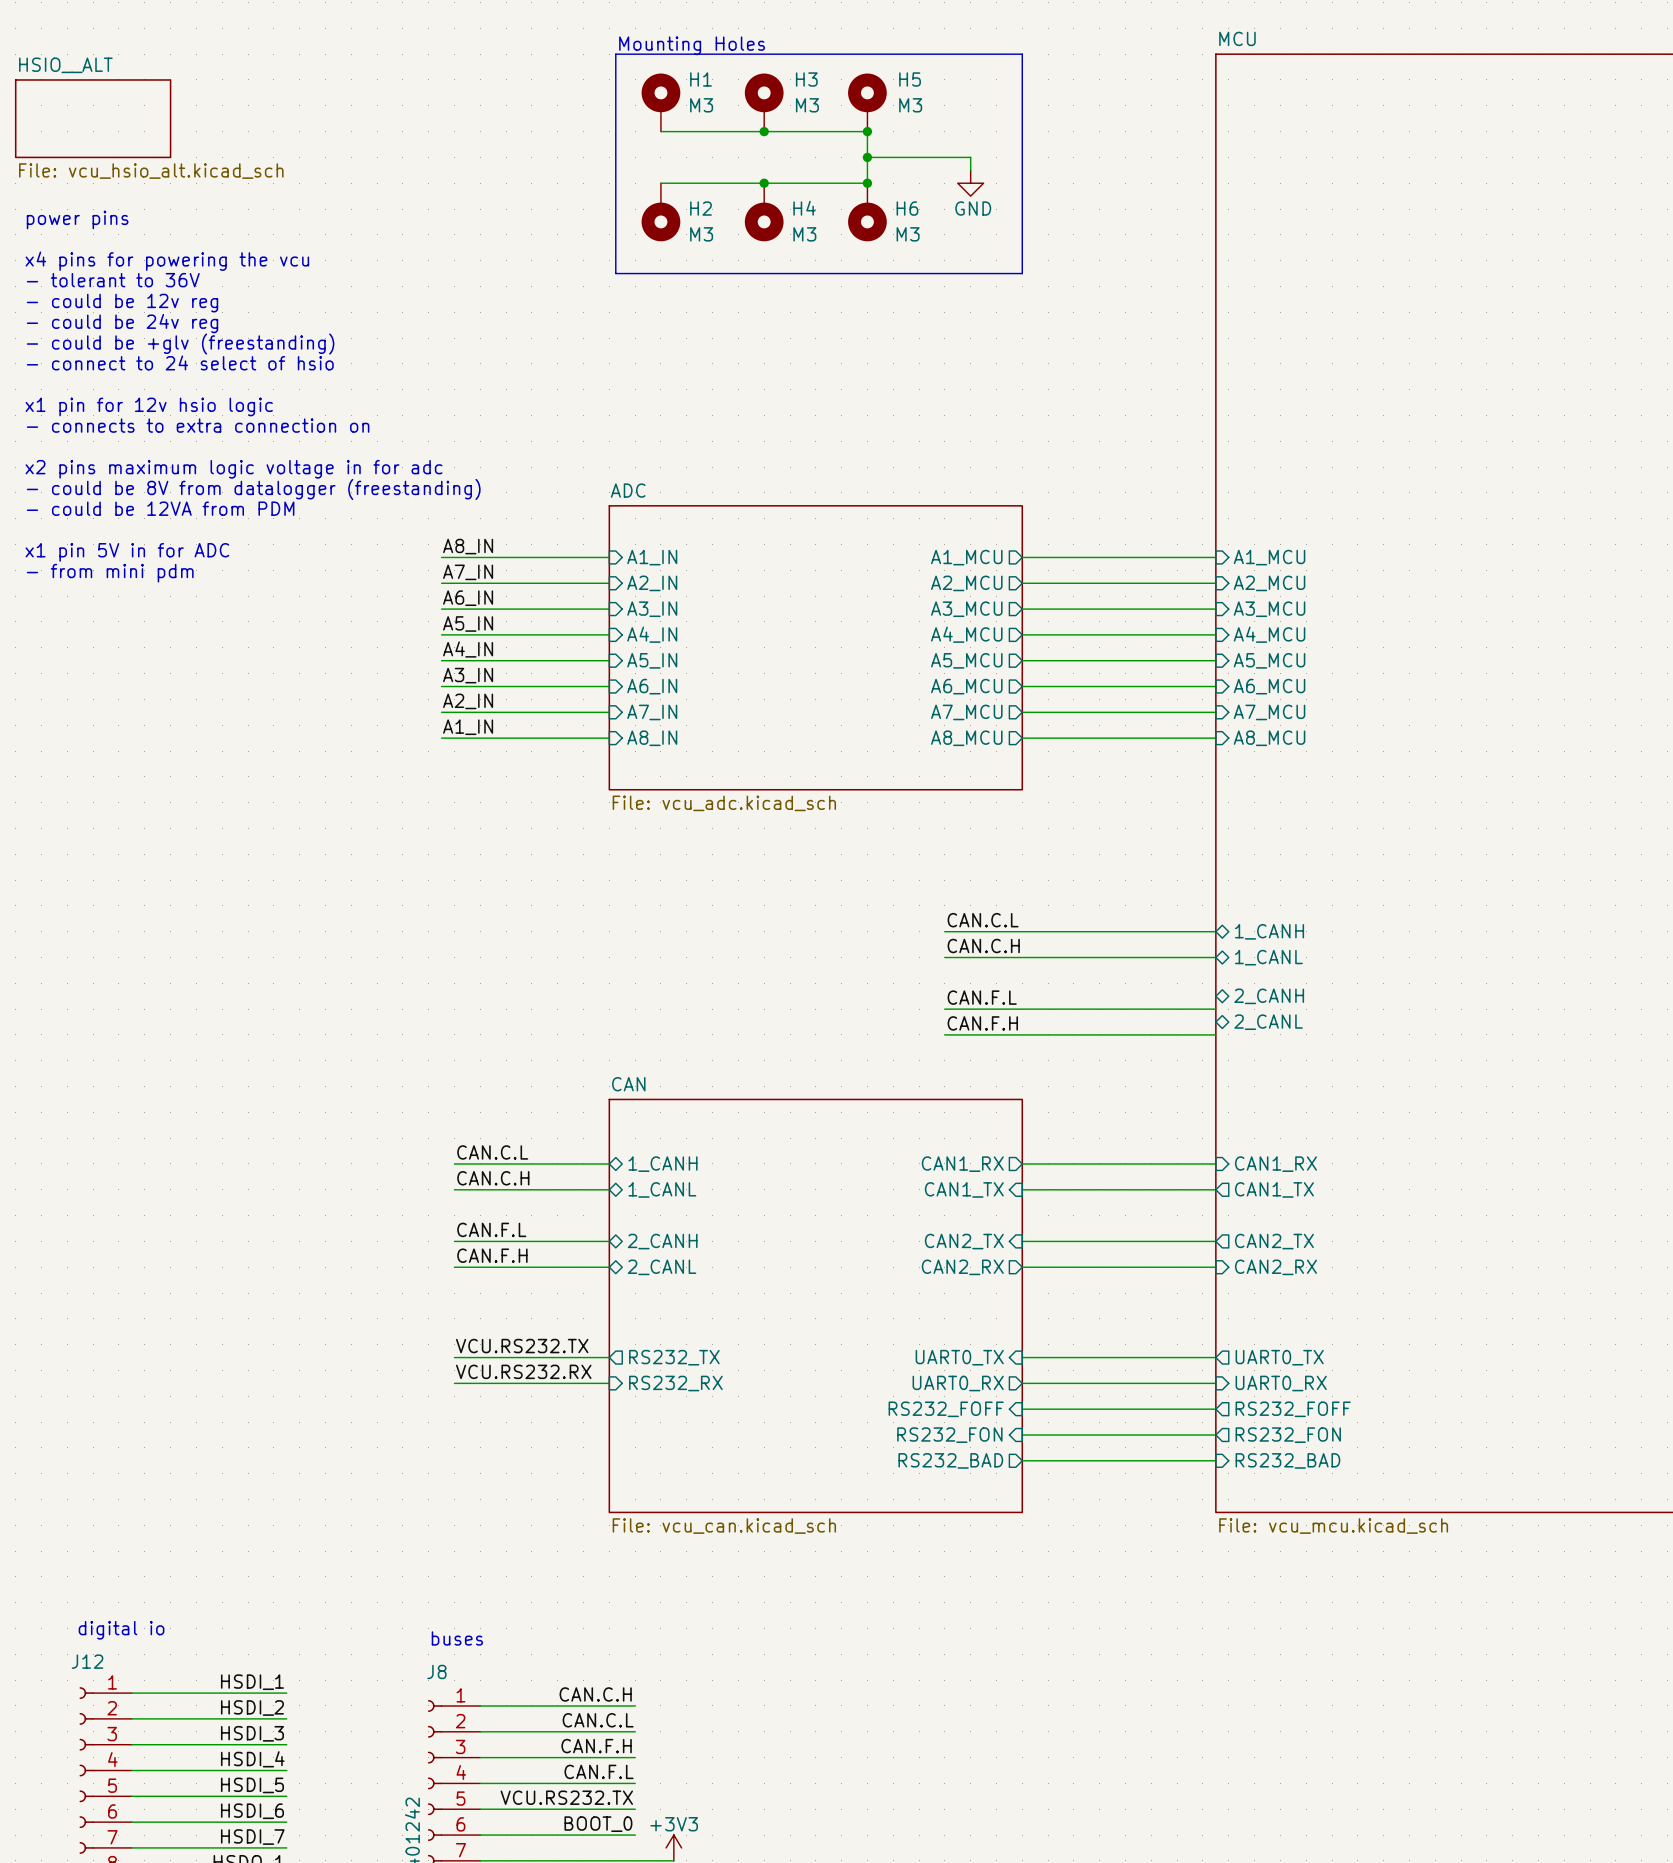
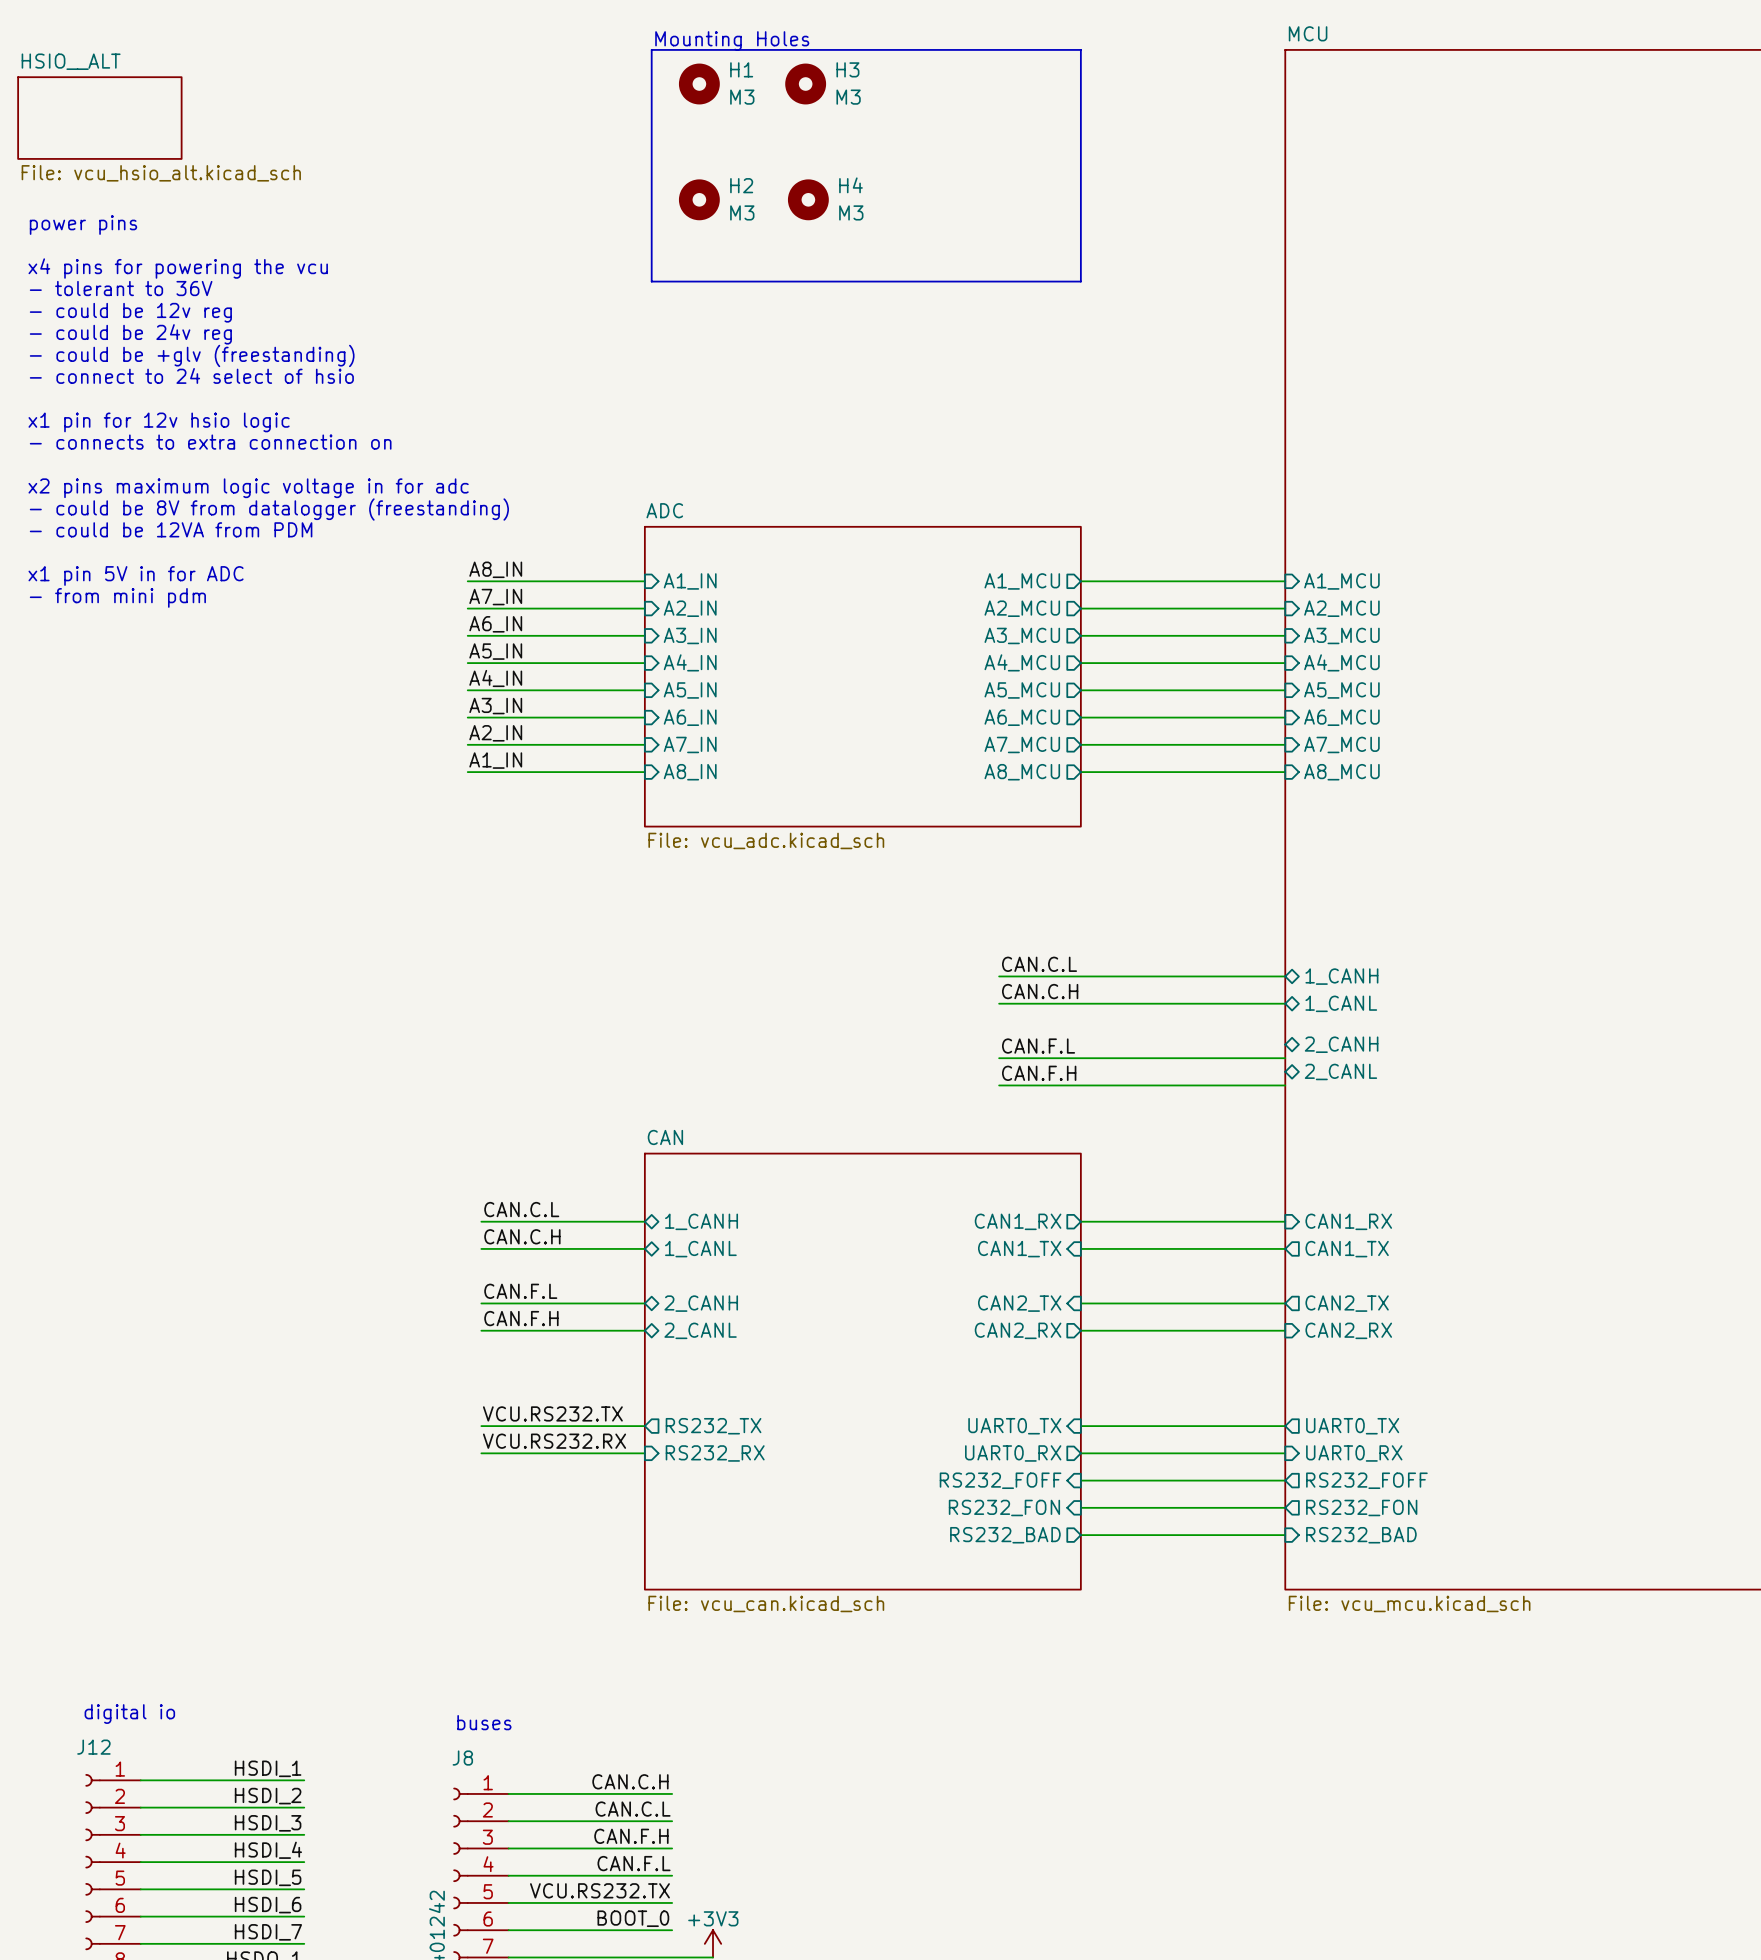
H1 symbol: [641, 73, 681, 132] -> [678, 63, 720, 105]
H3 symbol: [744, 73, 784, 132] -> [785, 63, 827, 105]
H5: M3 (867, 102) -> none
wire: (660, 131) (867, 131) (867, 183) (660, 183) -> none
junction: (764, 131) -> none
junction: (867, 131) -> none
wire: (867, 157) (970, 157) (970, 170) -> none
junction: (867, 157) -> none
H2 symbol: [641, 183, 681, 242] -> [678, 179, 720, 221]
H4 symbol: [744, 183, 784, 242] -> [787, 179, 829, 221]
junction: (764, 183) -> none
junction: (867, 183) -> none
power symbol: GND (970, 183) -> none
H6: M3 (867, 212) -> none

